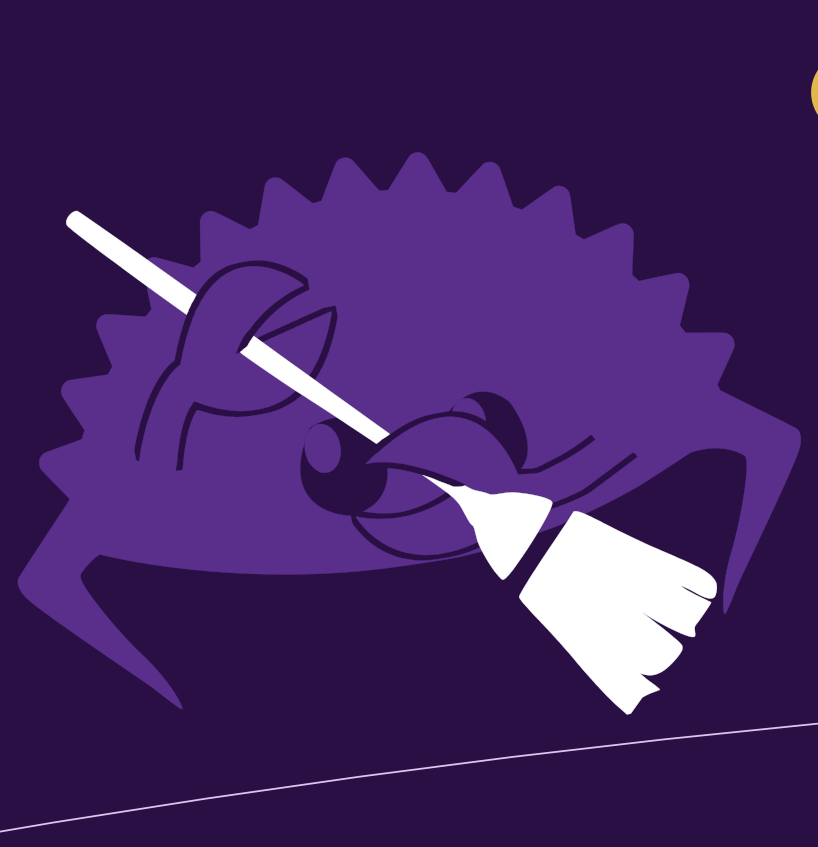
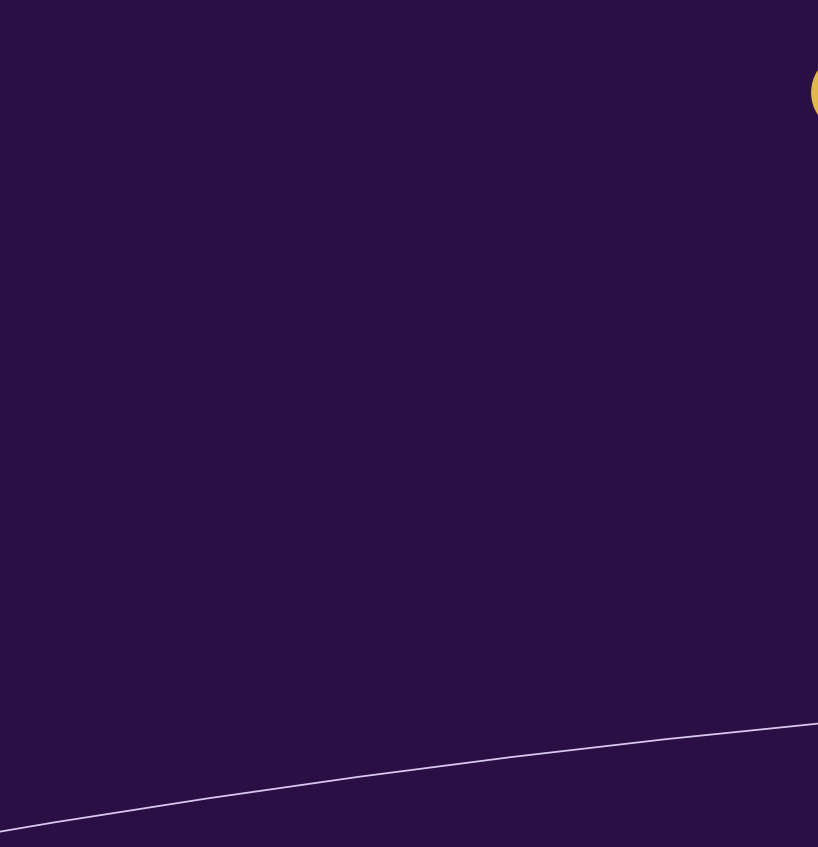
drawing: [17, 152, 802, 715] -> none

